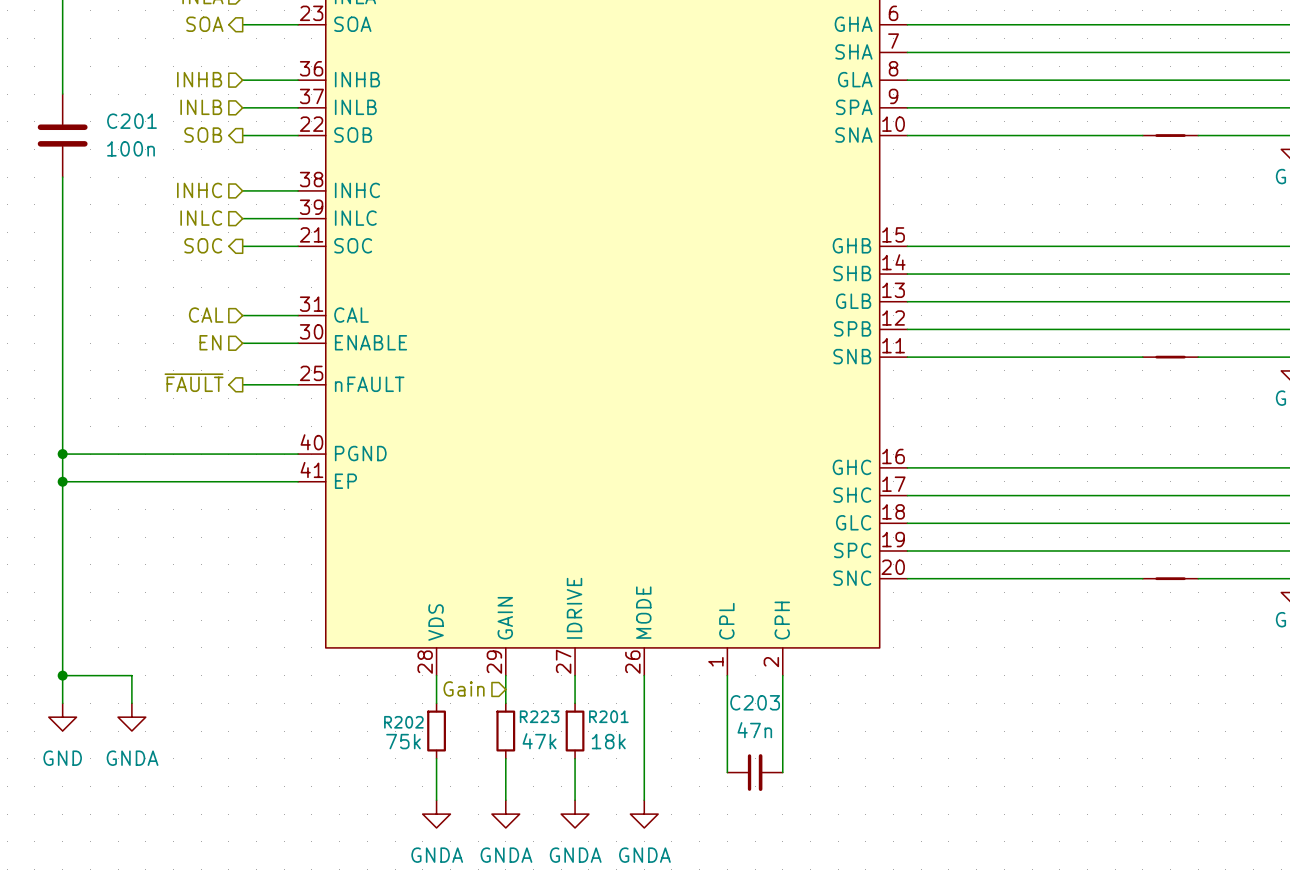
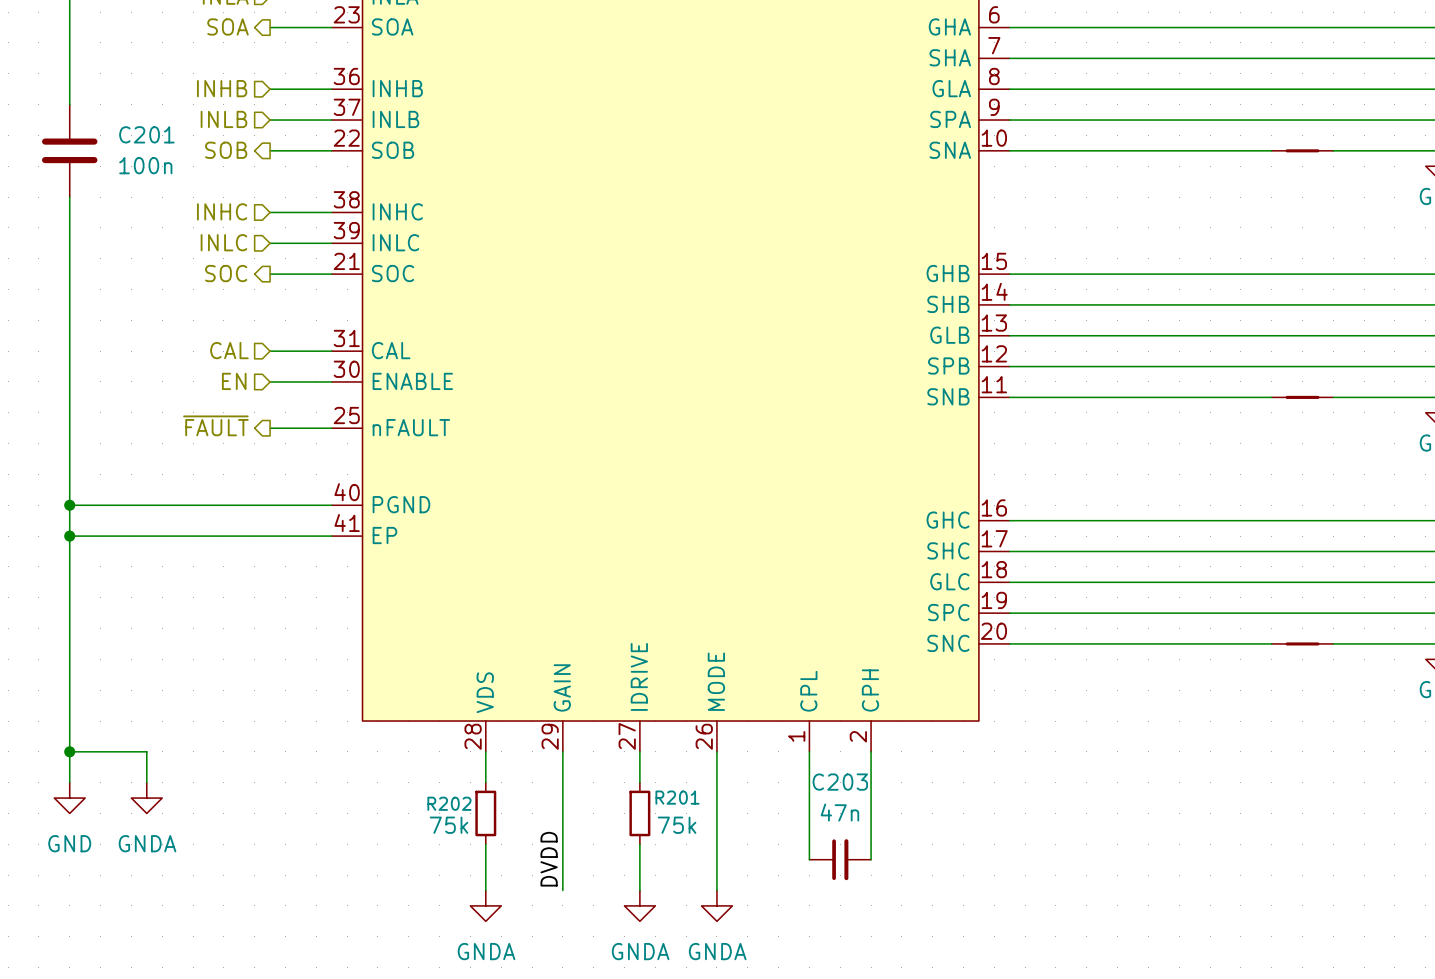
hierarchical label: Gain (464, 688) -> none
wire: none -> (562, 782) (562, 844)
R223: 47k (505, 731) -> none
R201 value: 18k (608, 741) -> 75k (677, 825)
label: none -> DVDD (549, 859)
power symbol: GNDA (505, 814) -> none

